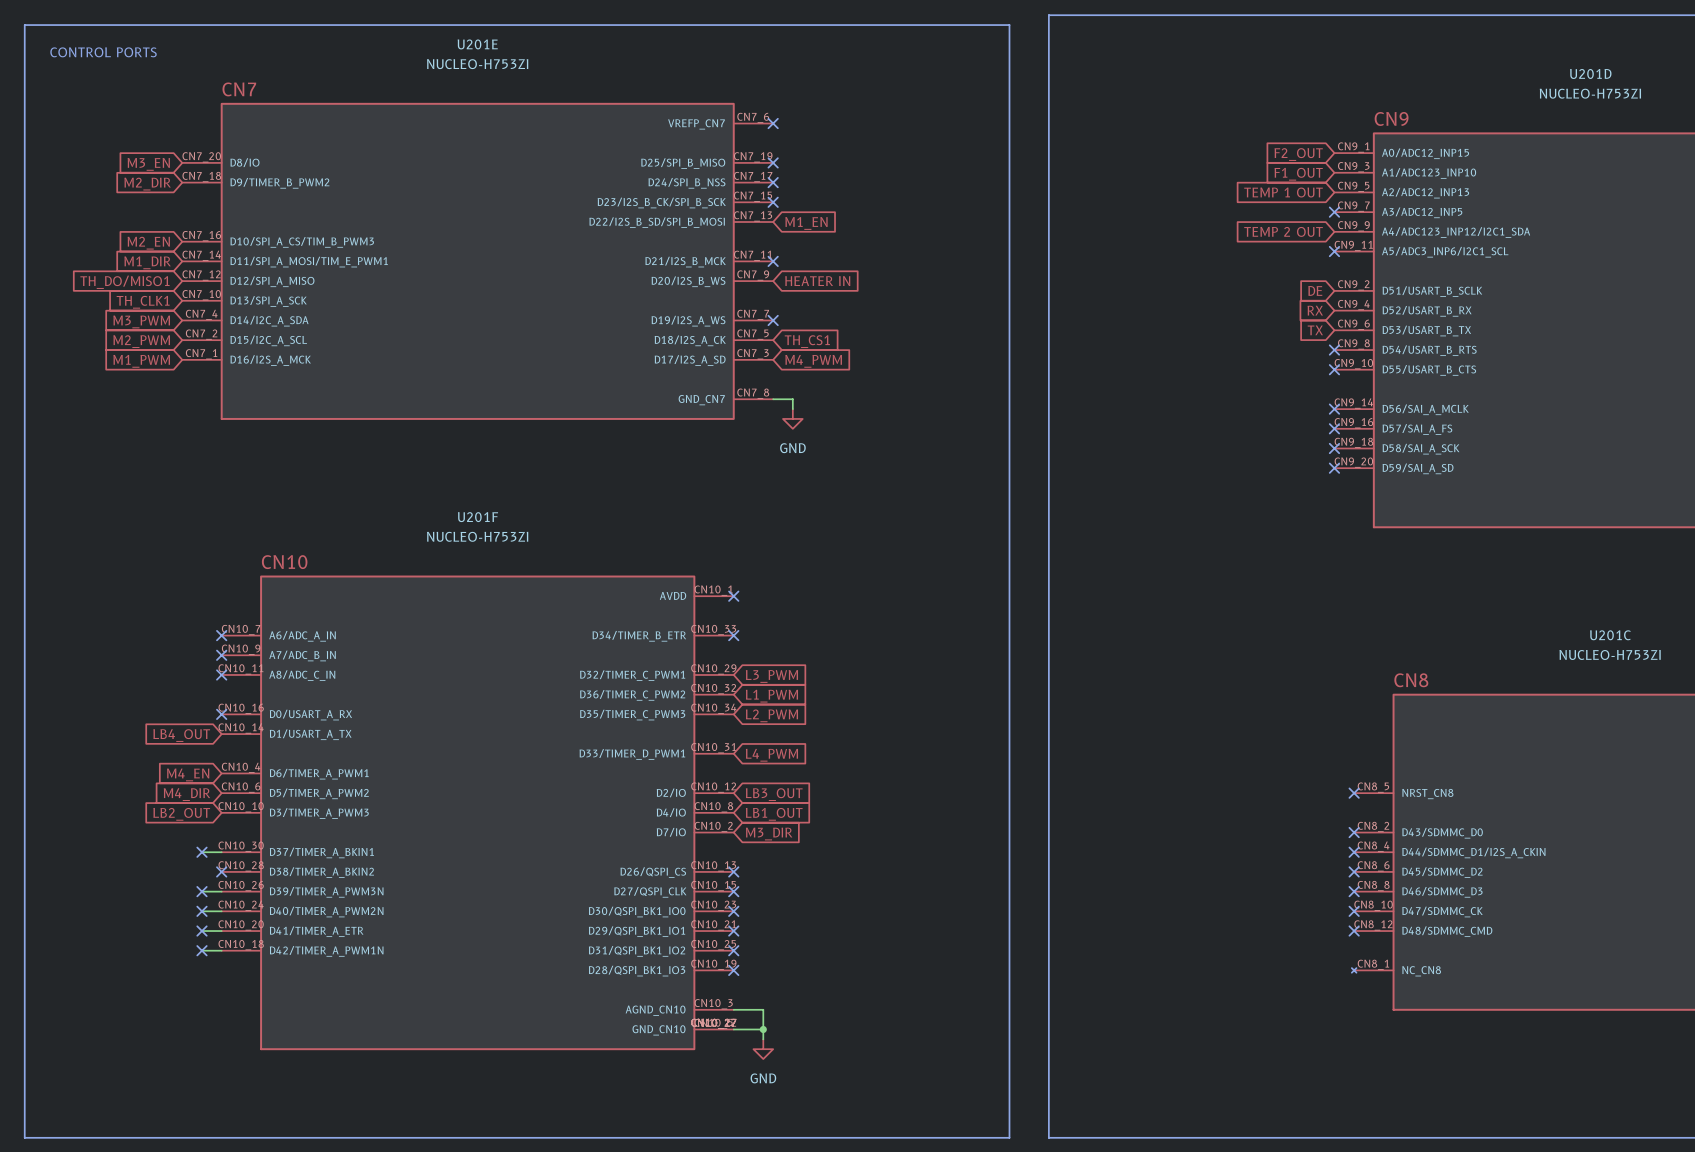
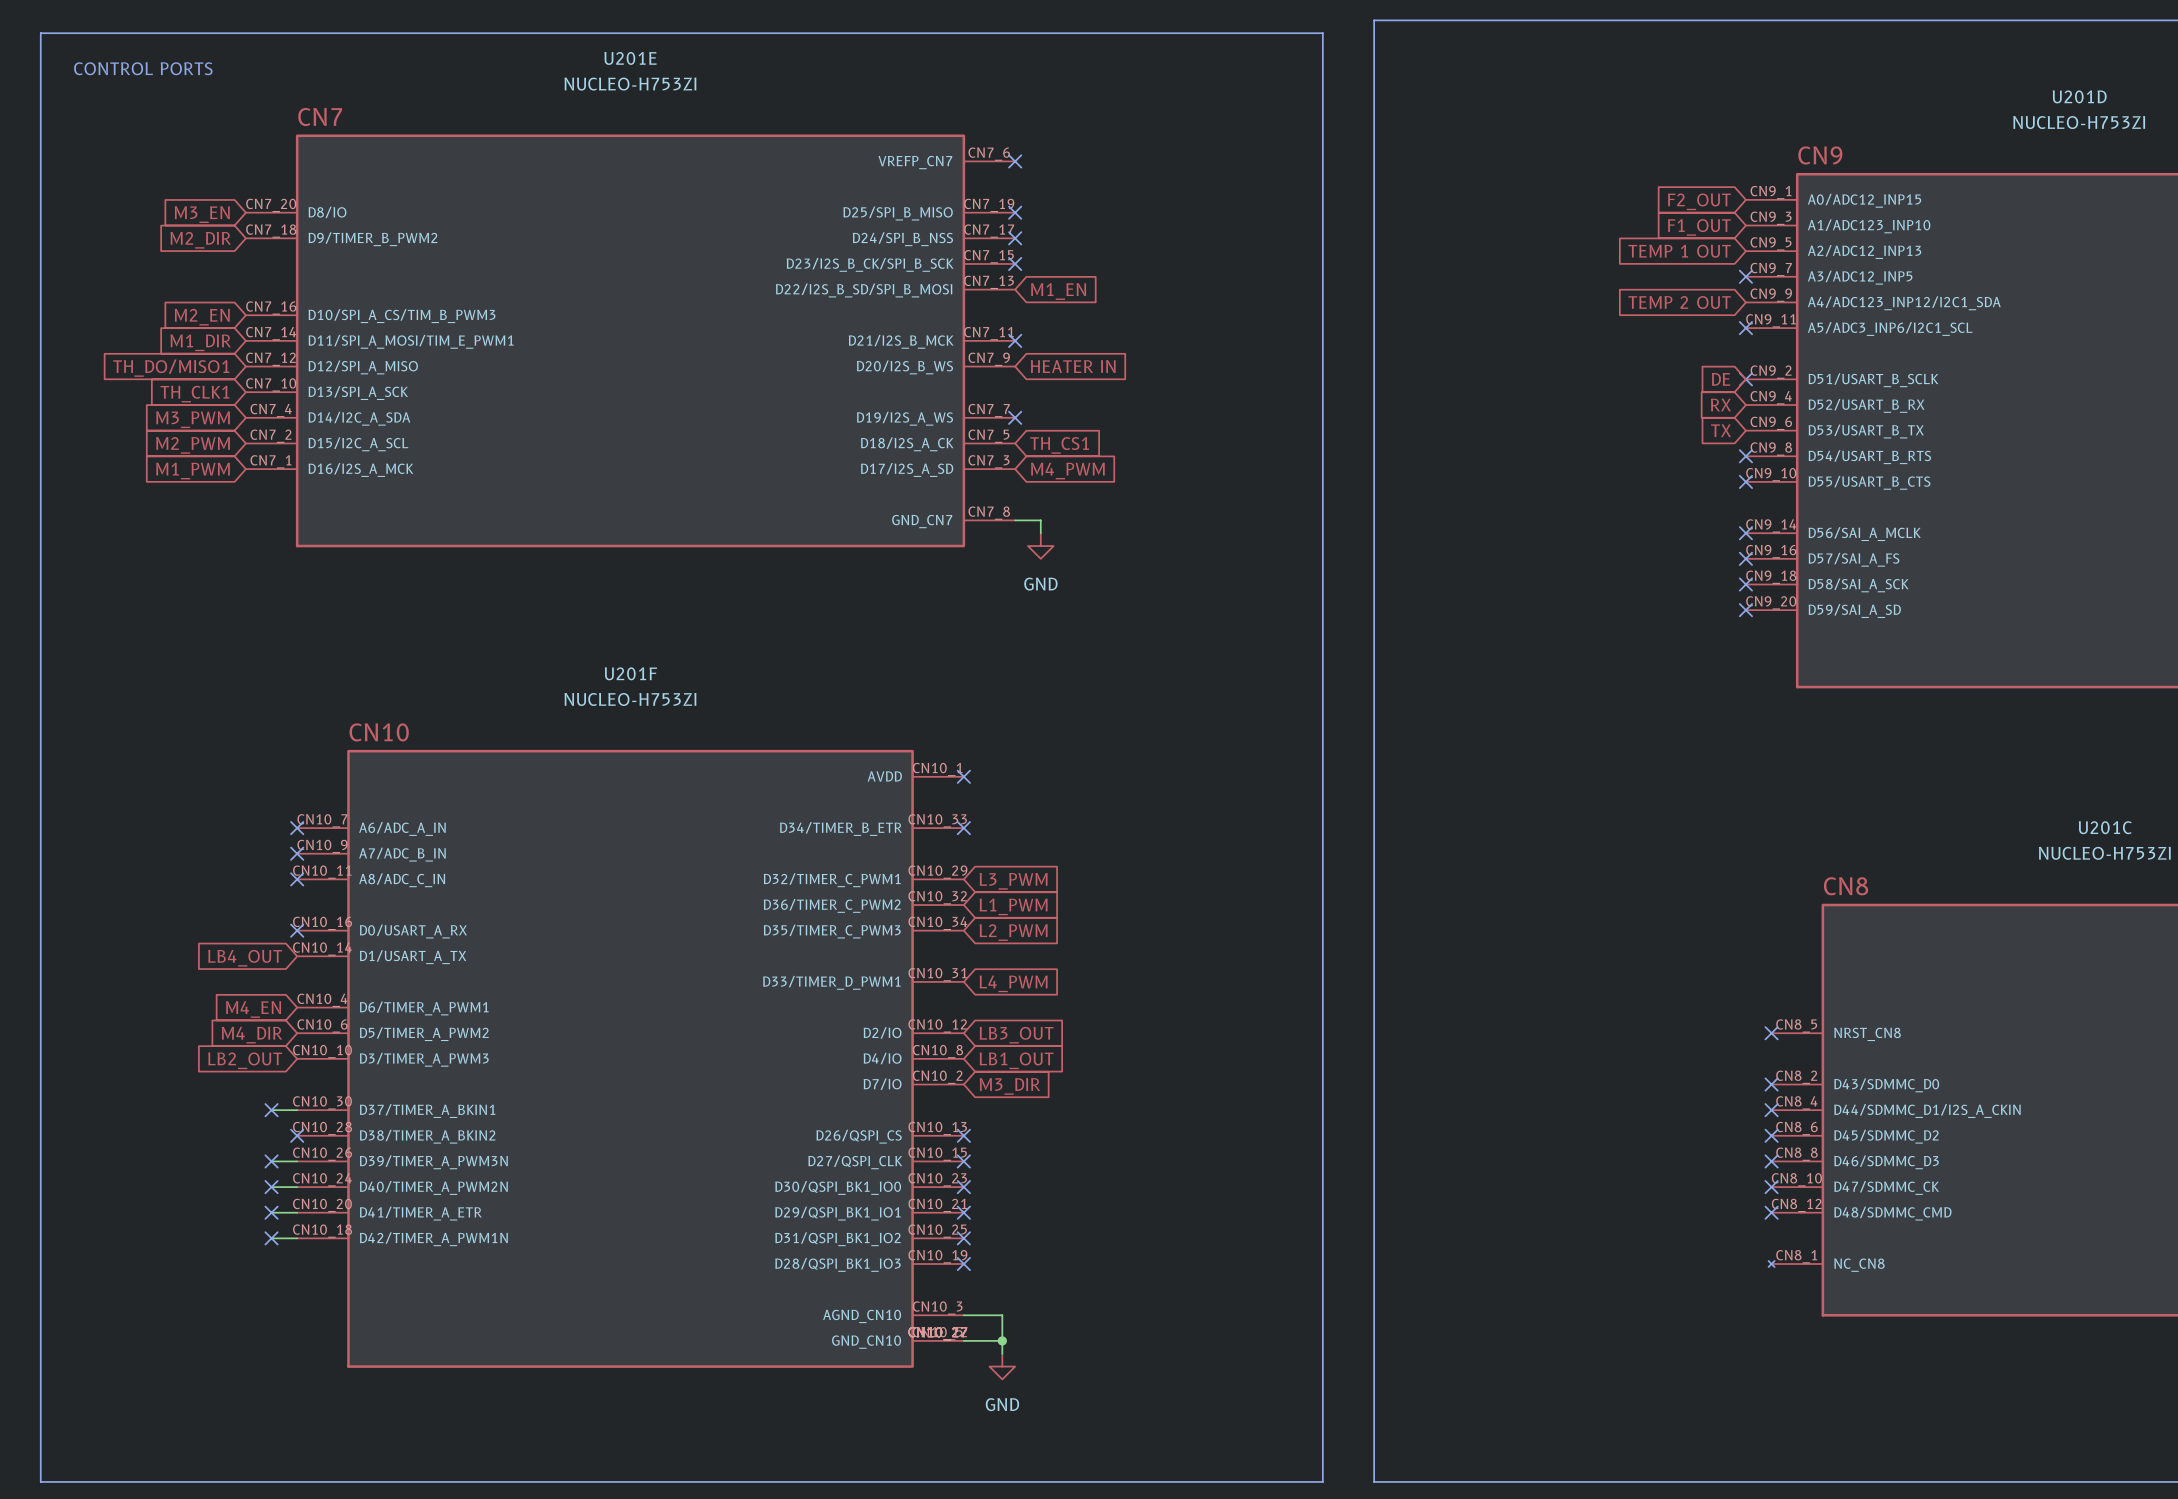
no-connect mark: none -> (1745, 379)

